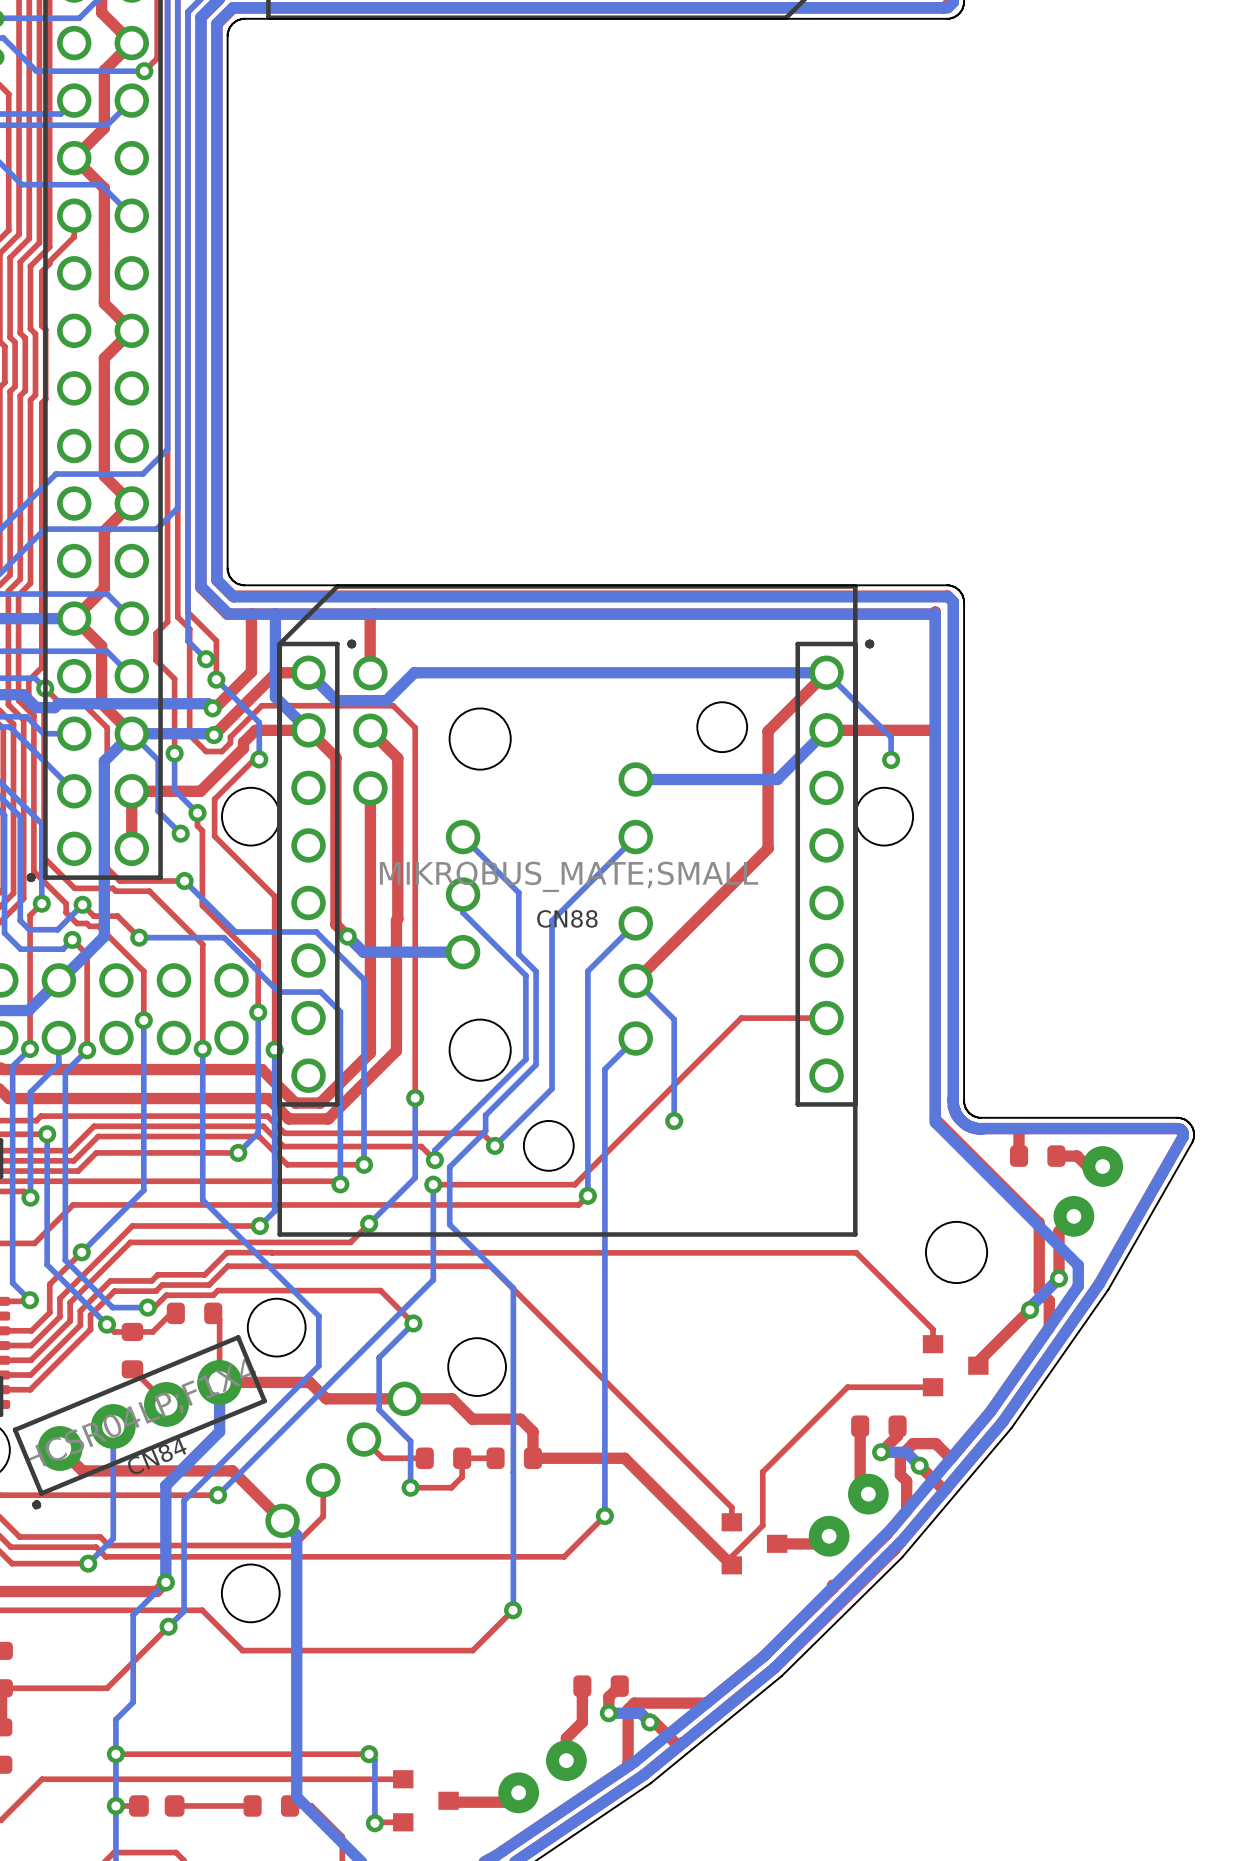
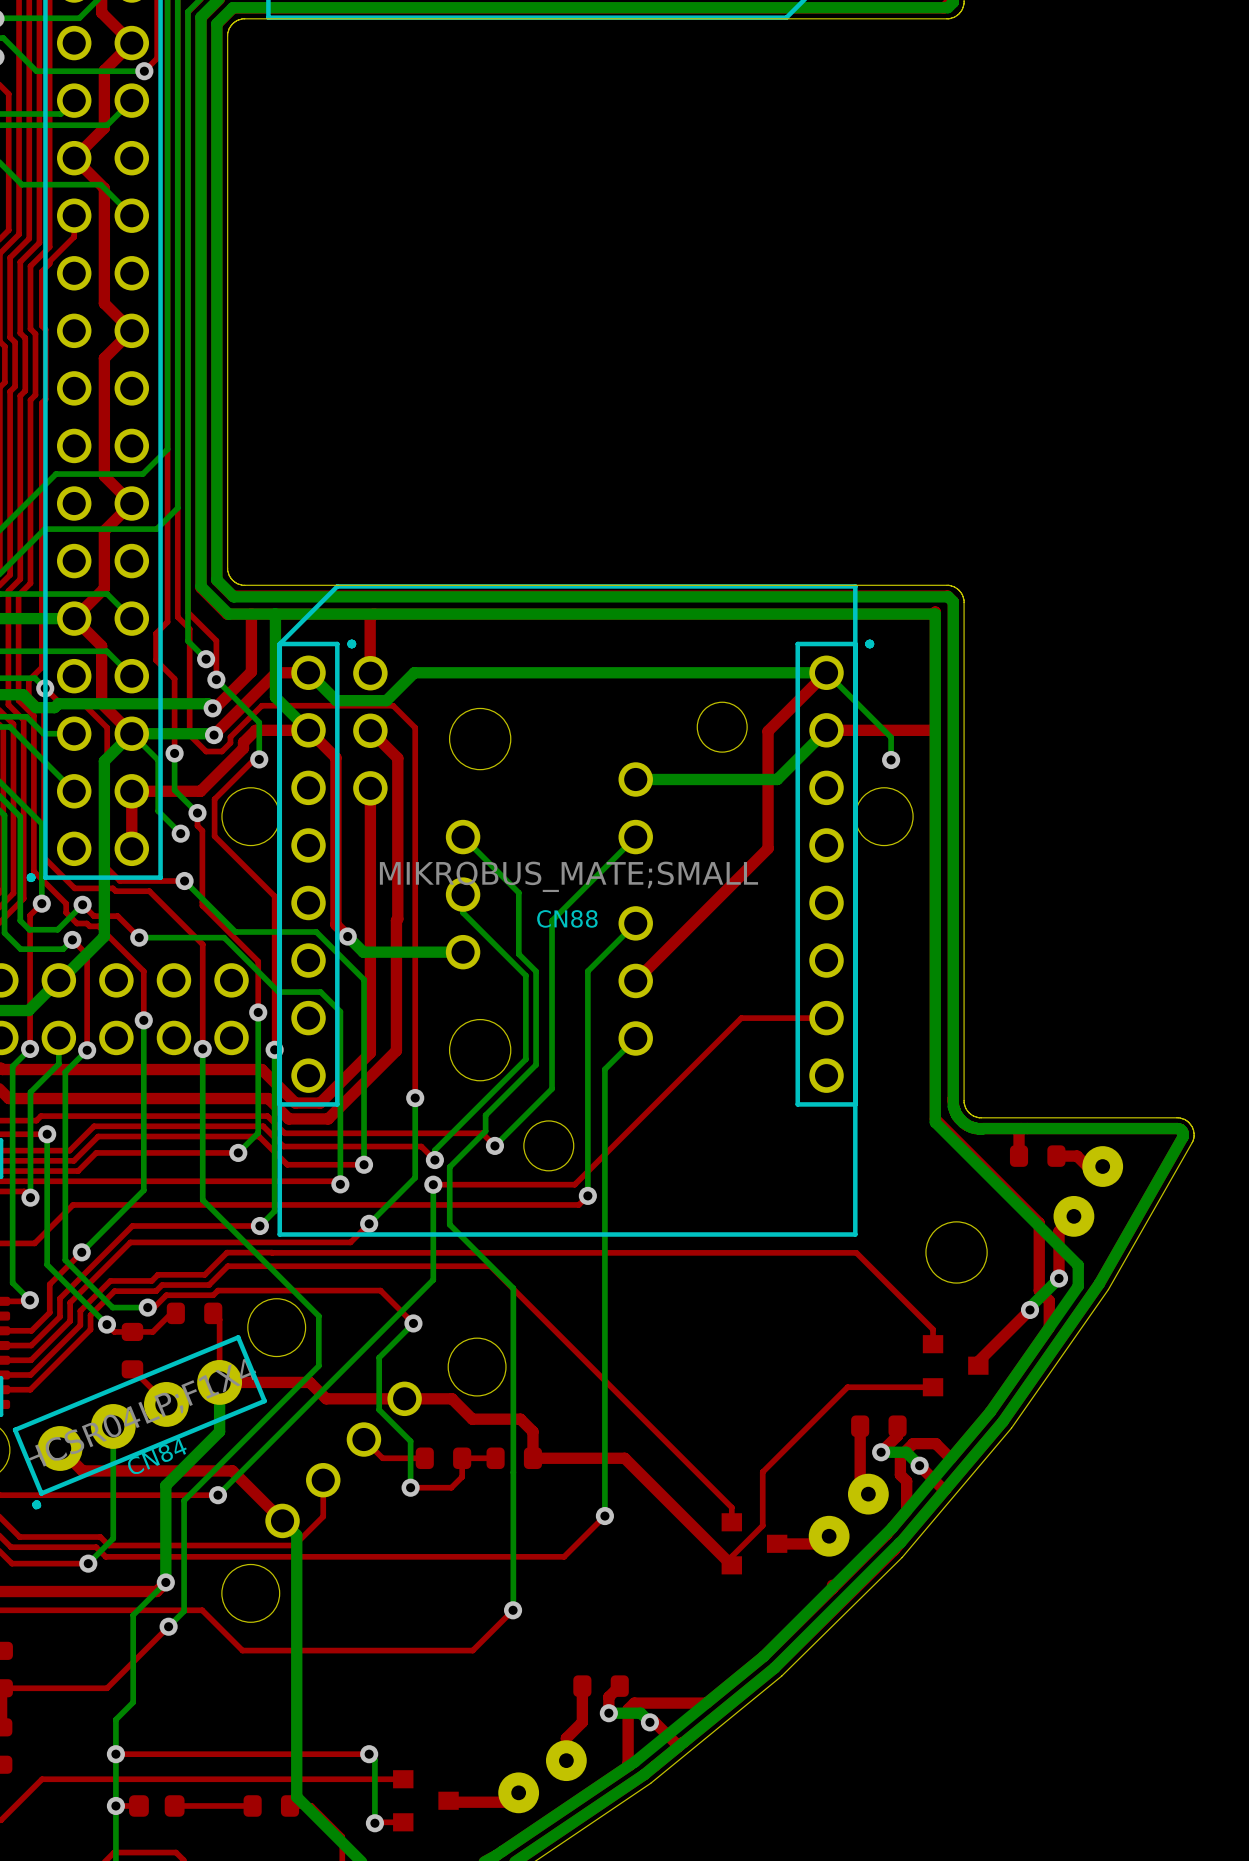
bottom track: (635, 980) (674, 1019) (674, 1121) -> none
via: (674, 1121) -> none

